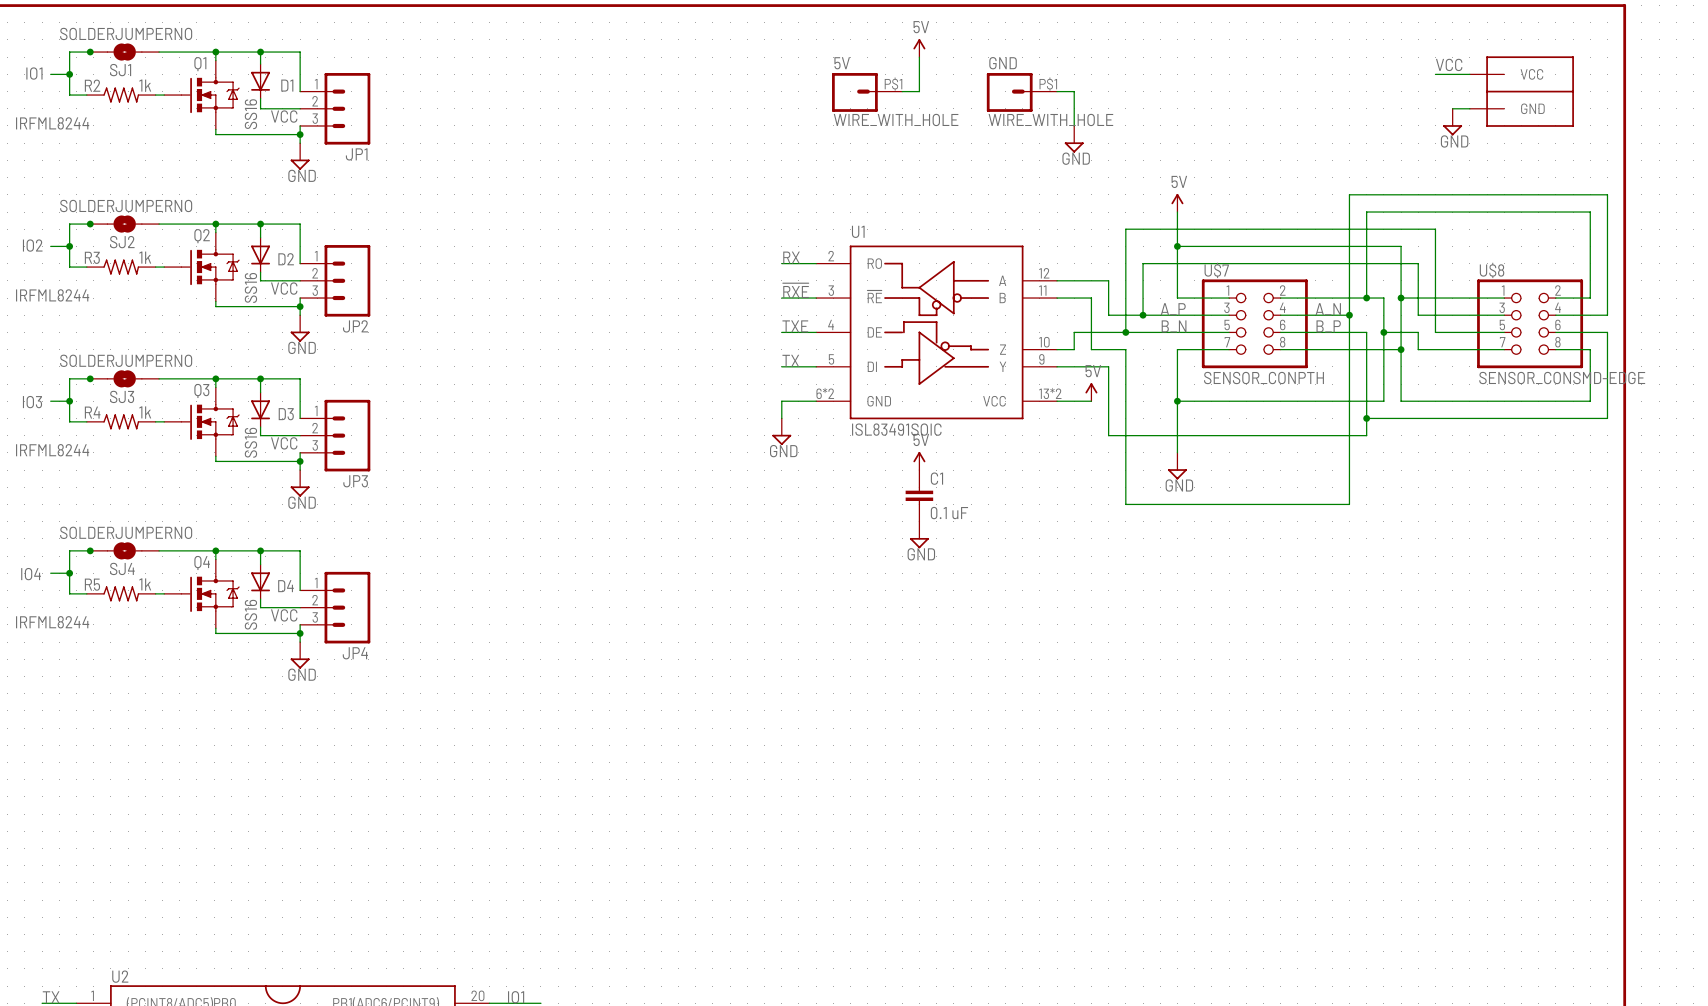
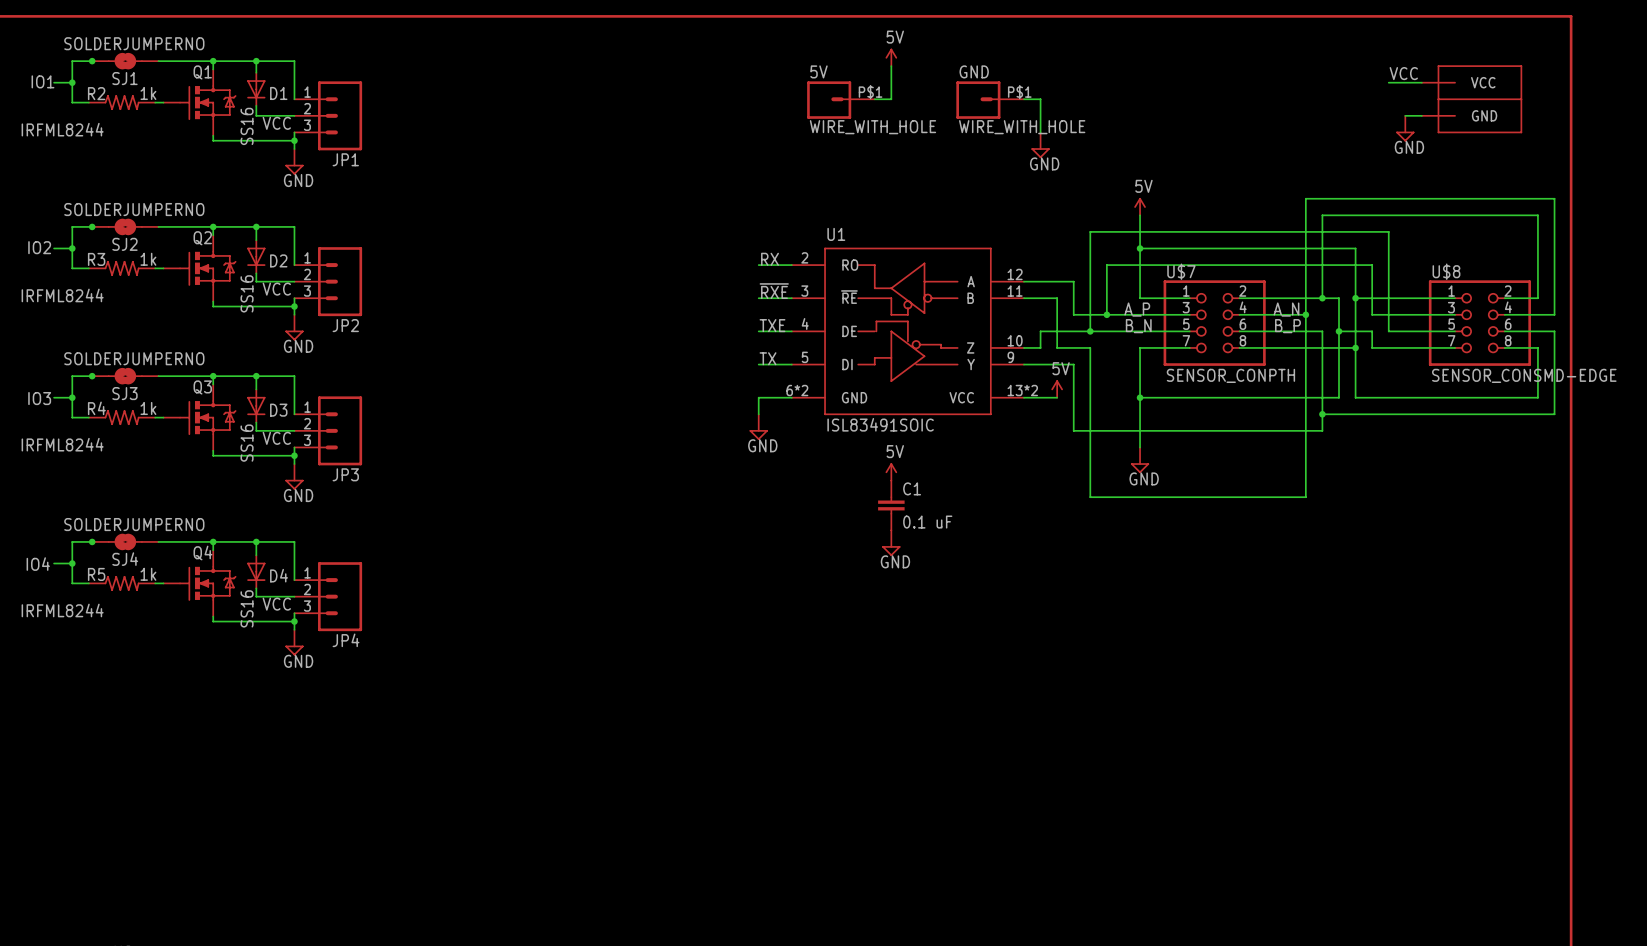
power symbol position: 5V (919, 461) -> 5V (891, 471)
C1 position: (919, 495) -> (891, 505)
power symbol position: GND (919, 534) -> GND (891, 543)

